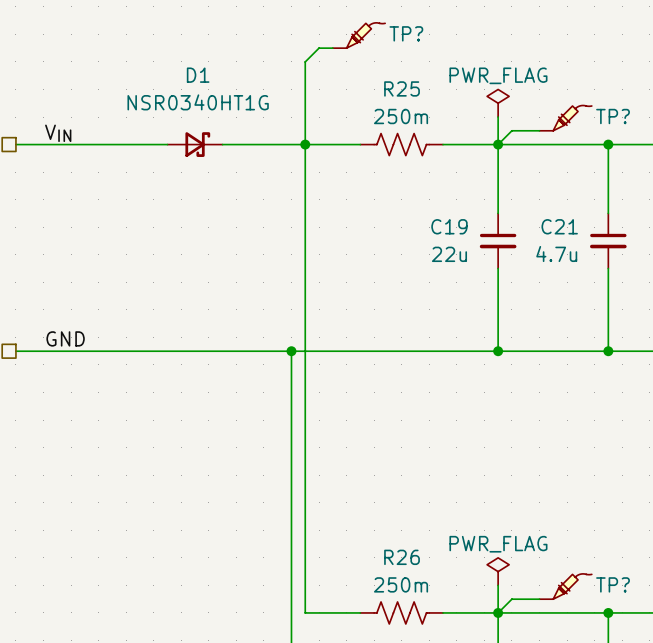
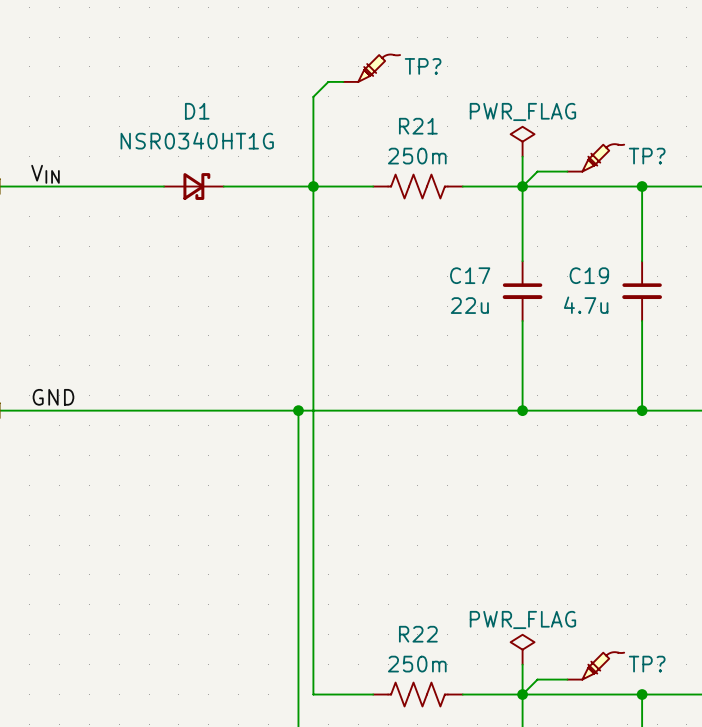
R25 name: R25 (402, 88) -> R21 (418, 126)
C19 name: C19 (449, 226) -> C17 (470, 275)
C21 name: C21 (559, 226) -> C19 (589, 275)
R26 name: R26 (402, 557) -> R22 (418, 634)

